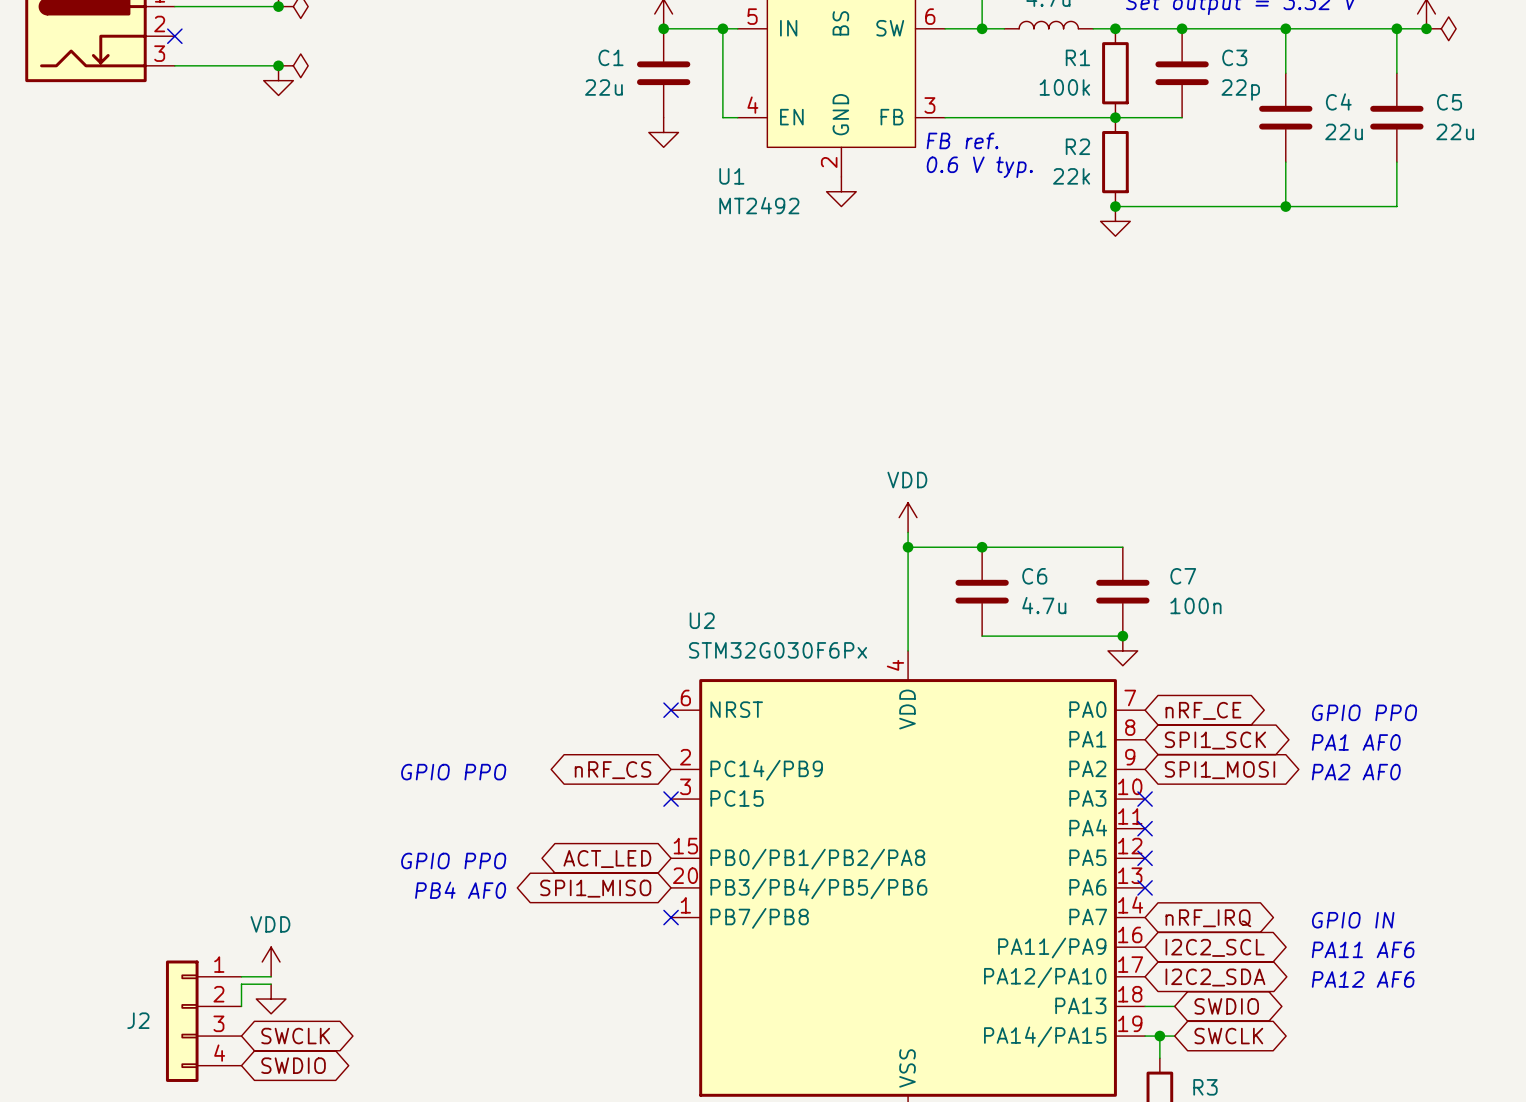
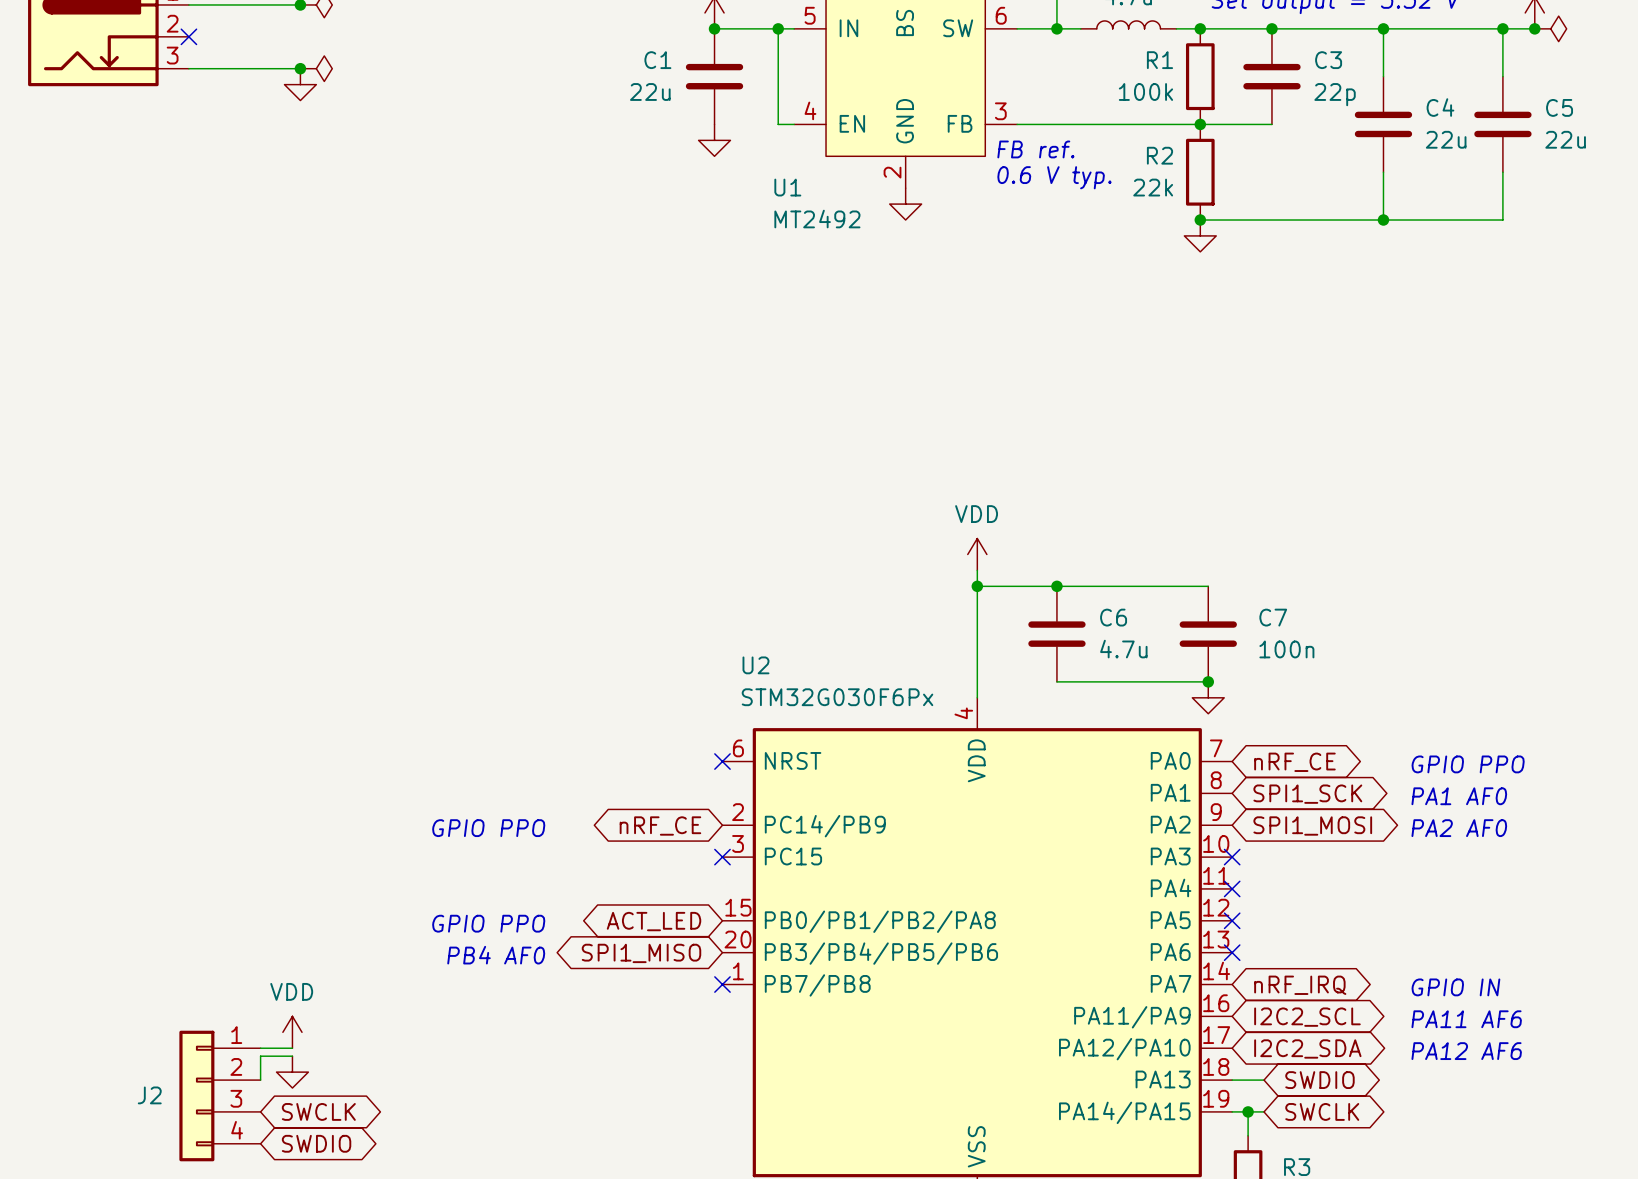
global label: nRF_CS (613, 770) -> nRF_CE (660, 826)

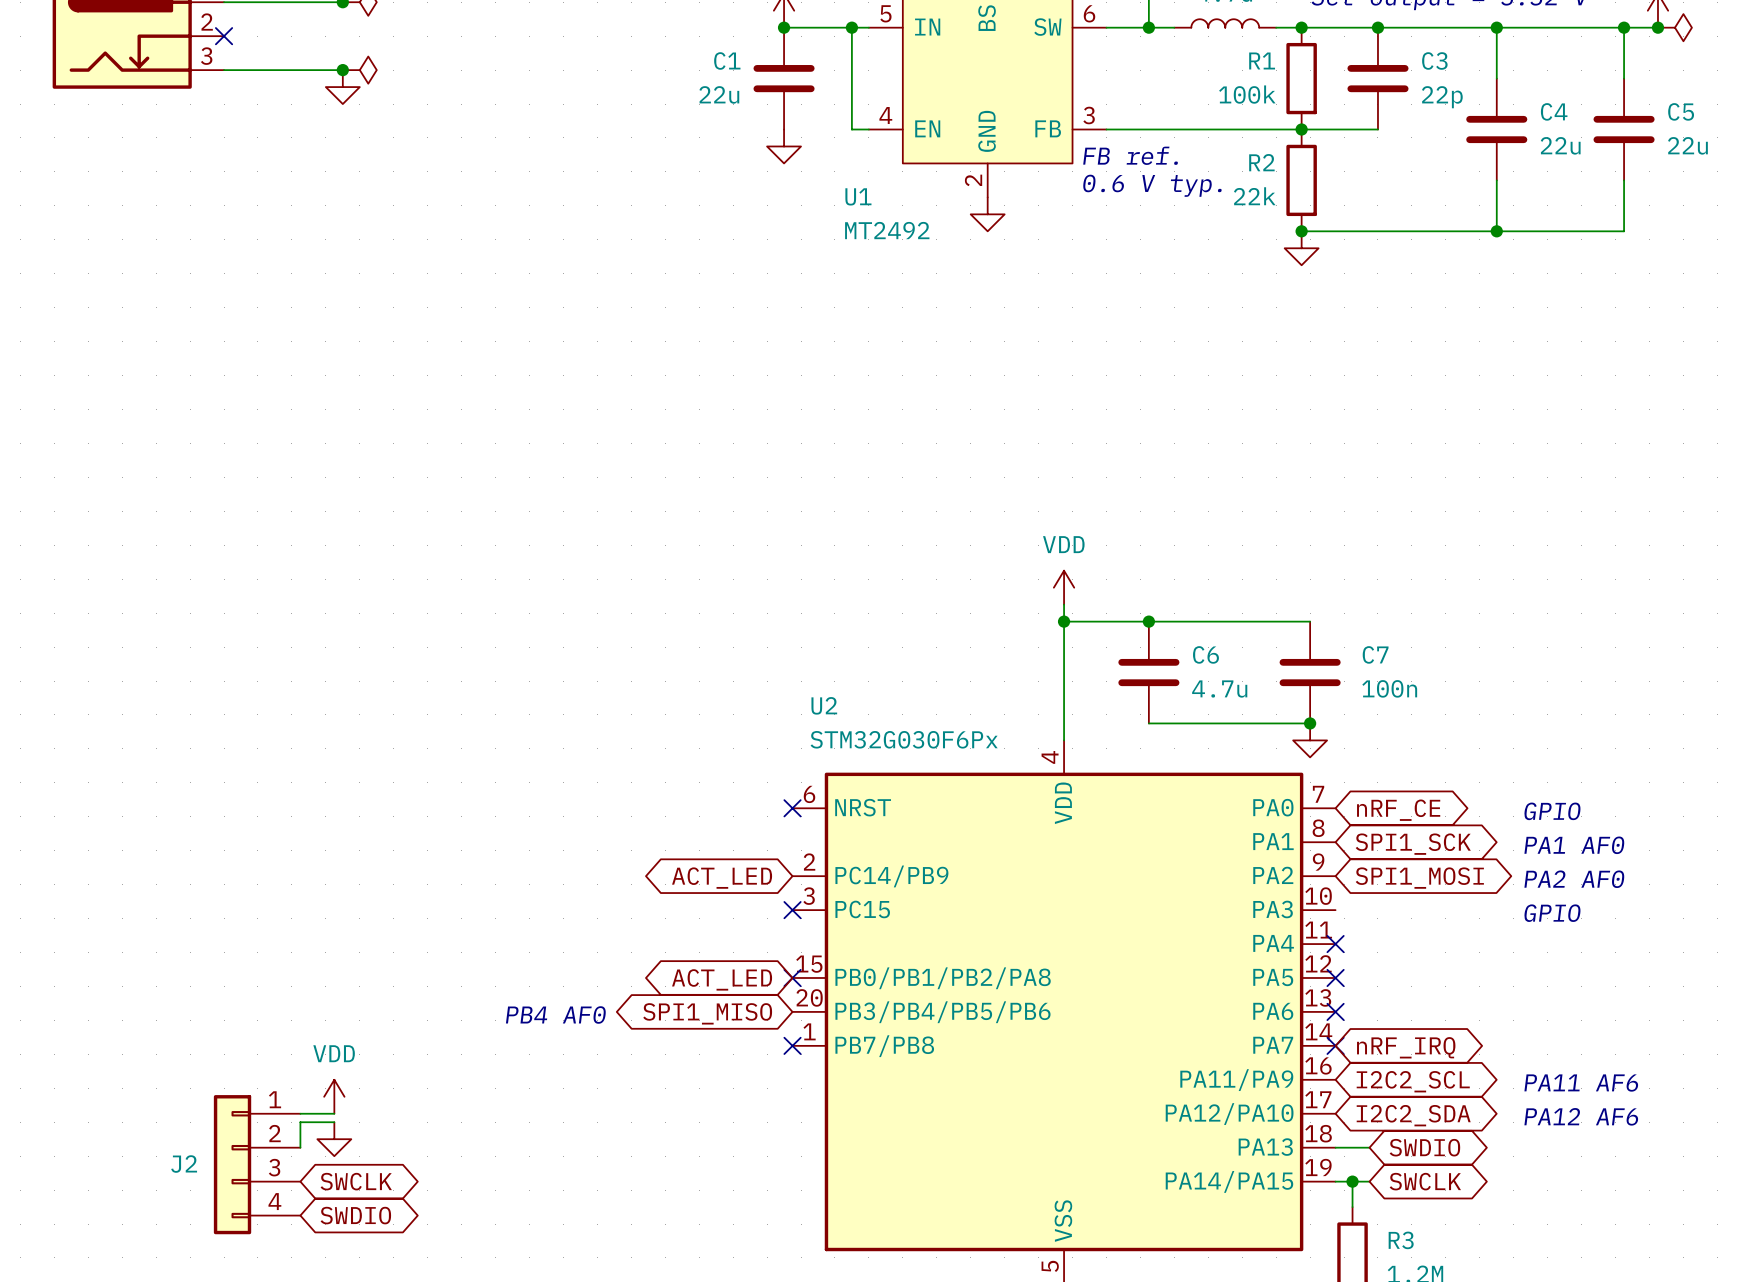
text: GPIO PPO (1468, 764) -> GPIO (1552, 811)
global label: nRF_CE (660, 826) -> ACT_LED (722, 878)
text: GPIO PPO (488, 828) -> none
no-connect mark: (1232, 857) -> none
text: none -> GPIO (1552, 913)
no-connect mark: none -> (792, 977)
text: GPIO PPO (488, 923) -> none
no-connect mark: none -> (1335, 1045)
text: GPIO IN (1455, 987) -> none

